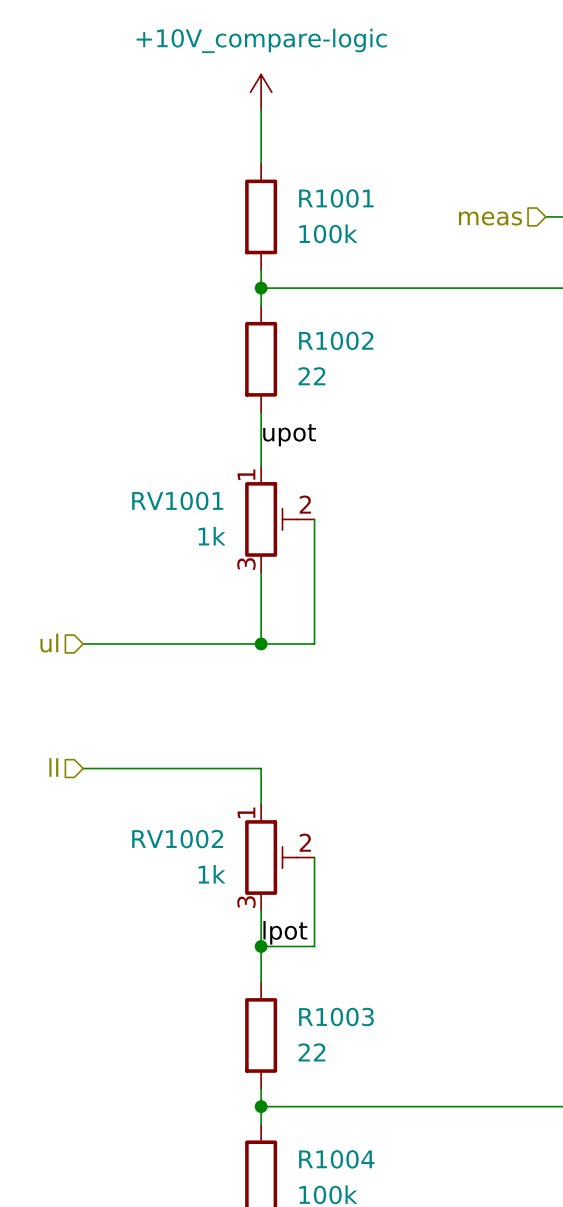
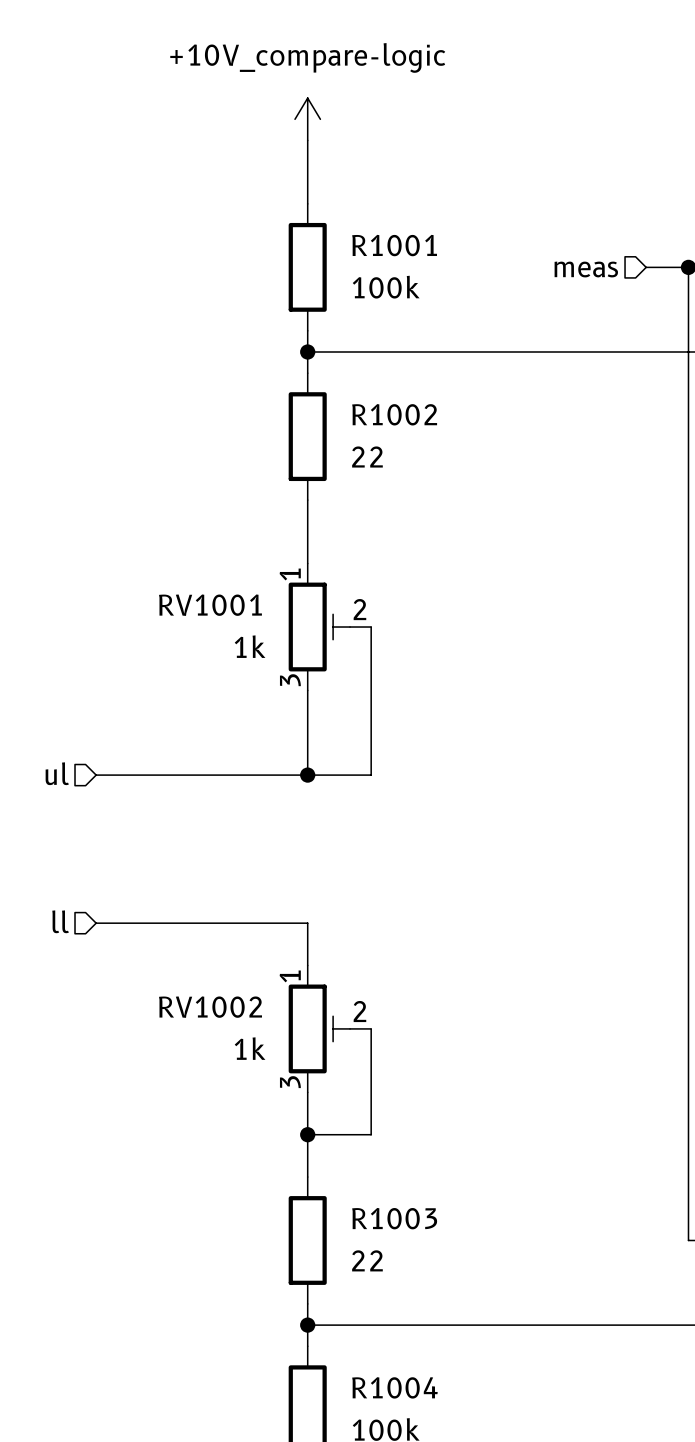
label: upot (289, 435) -> none
label: lpot (285, 932) -> none

